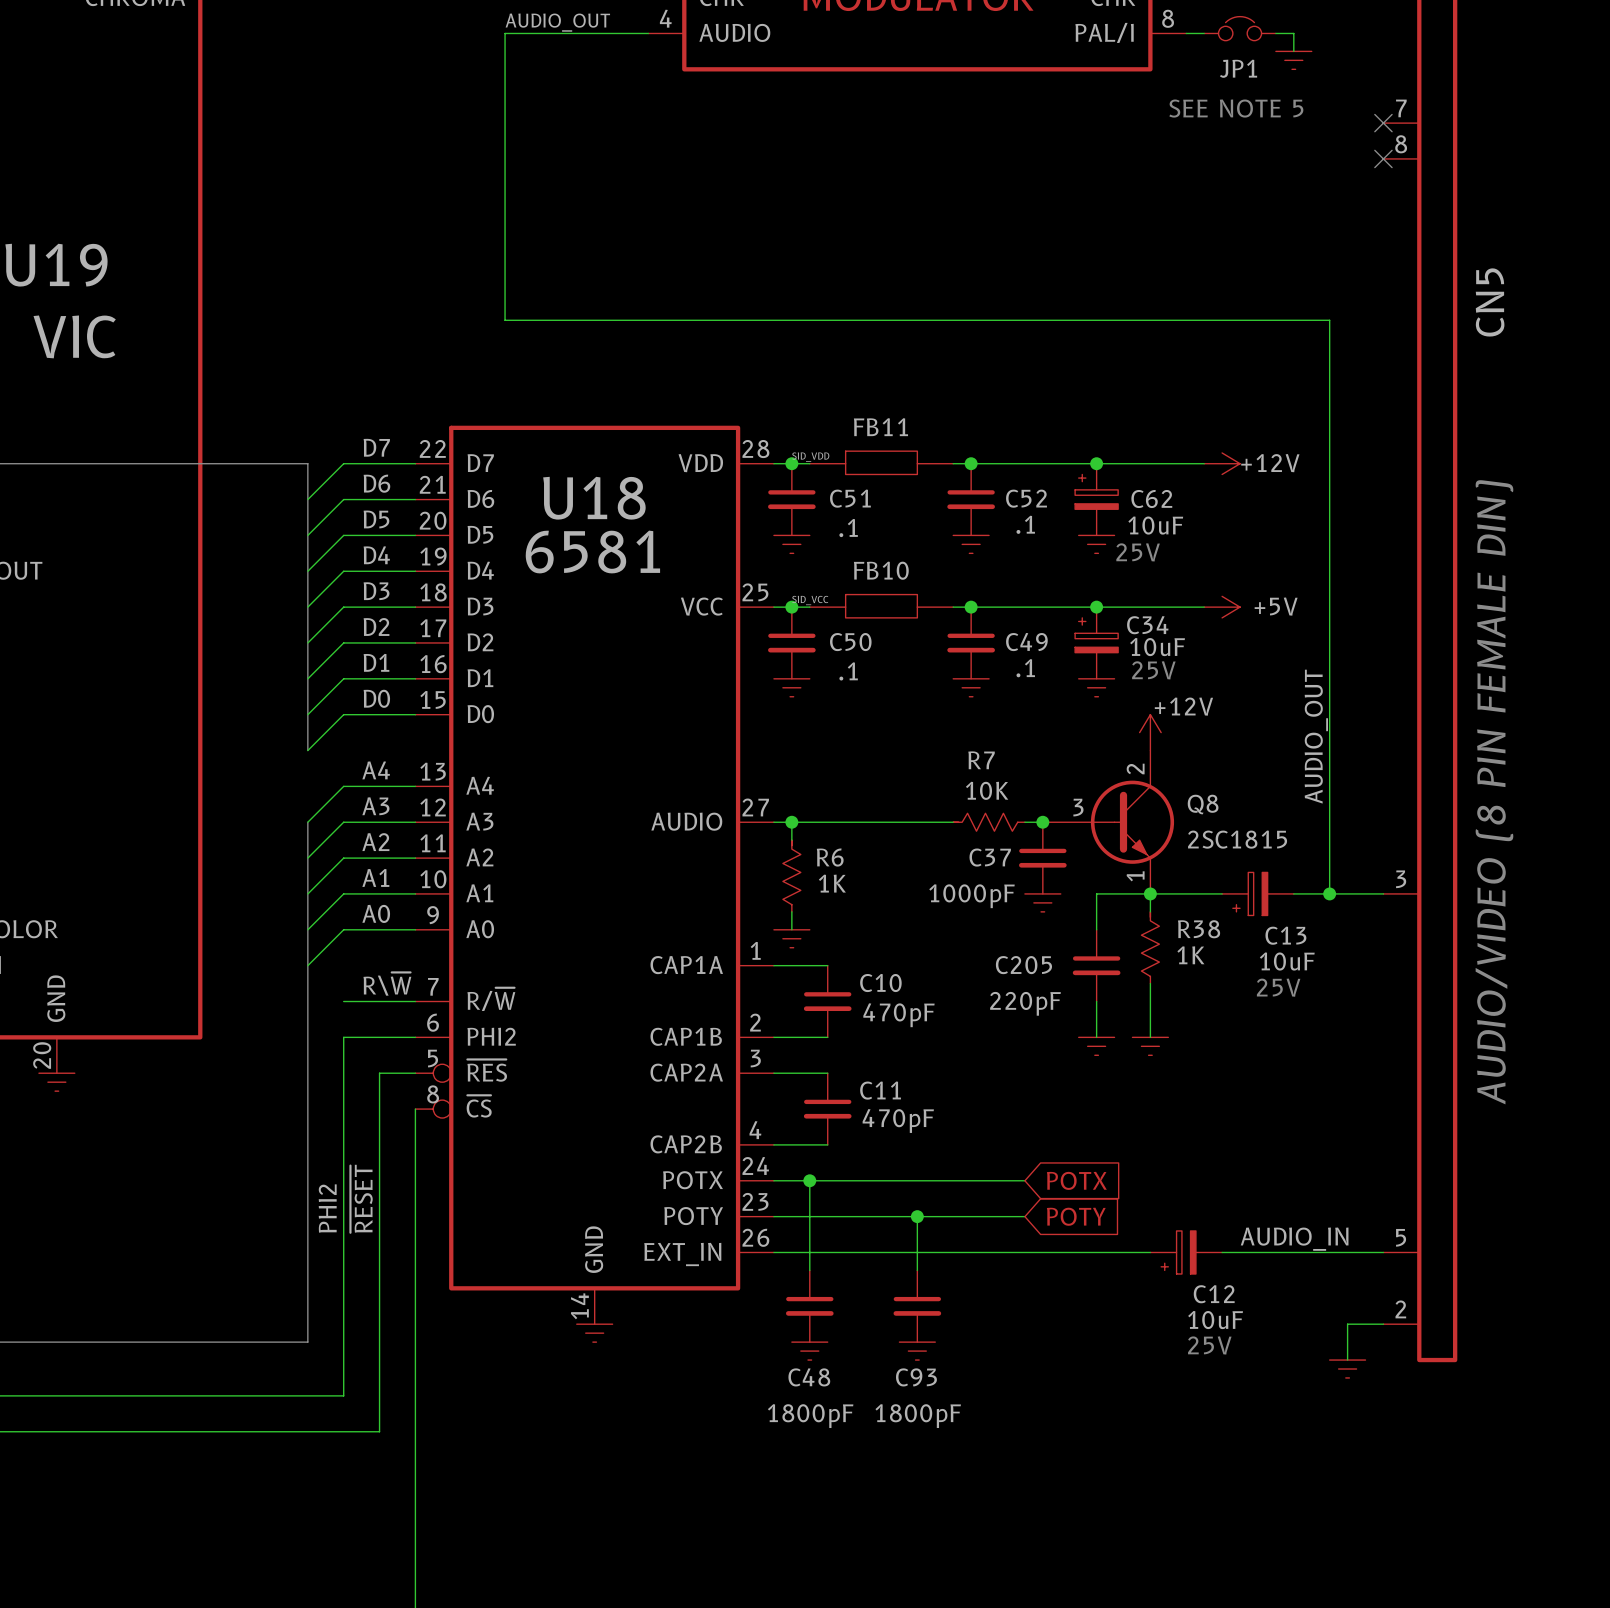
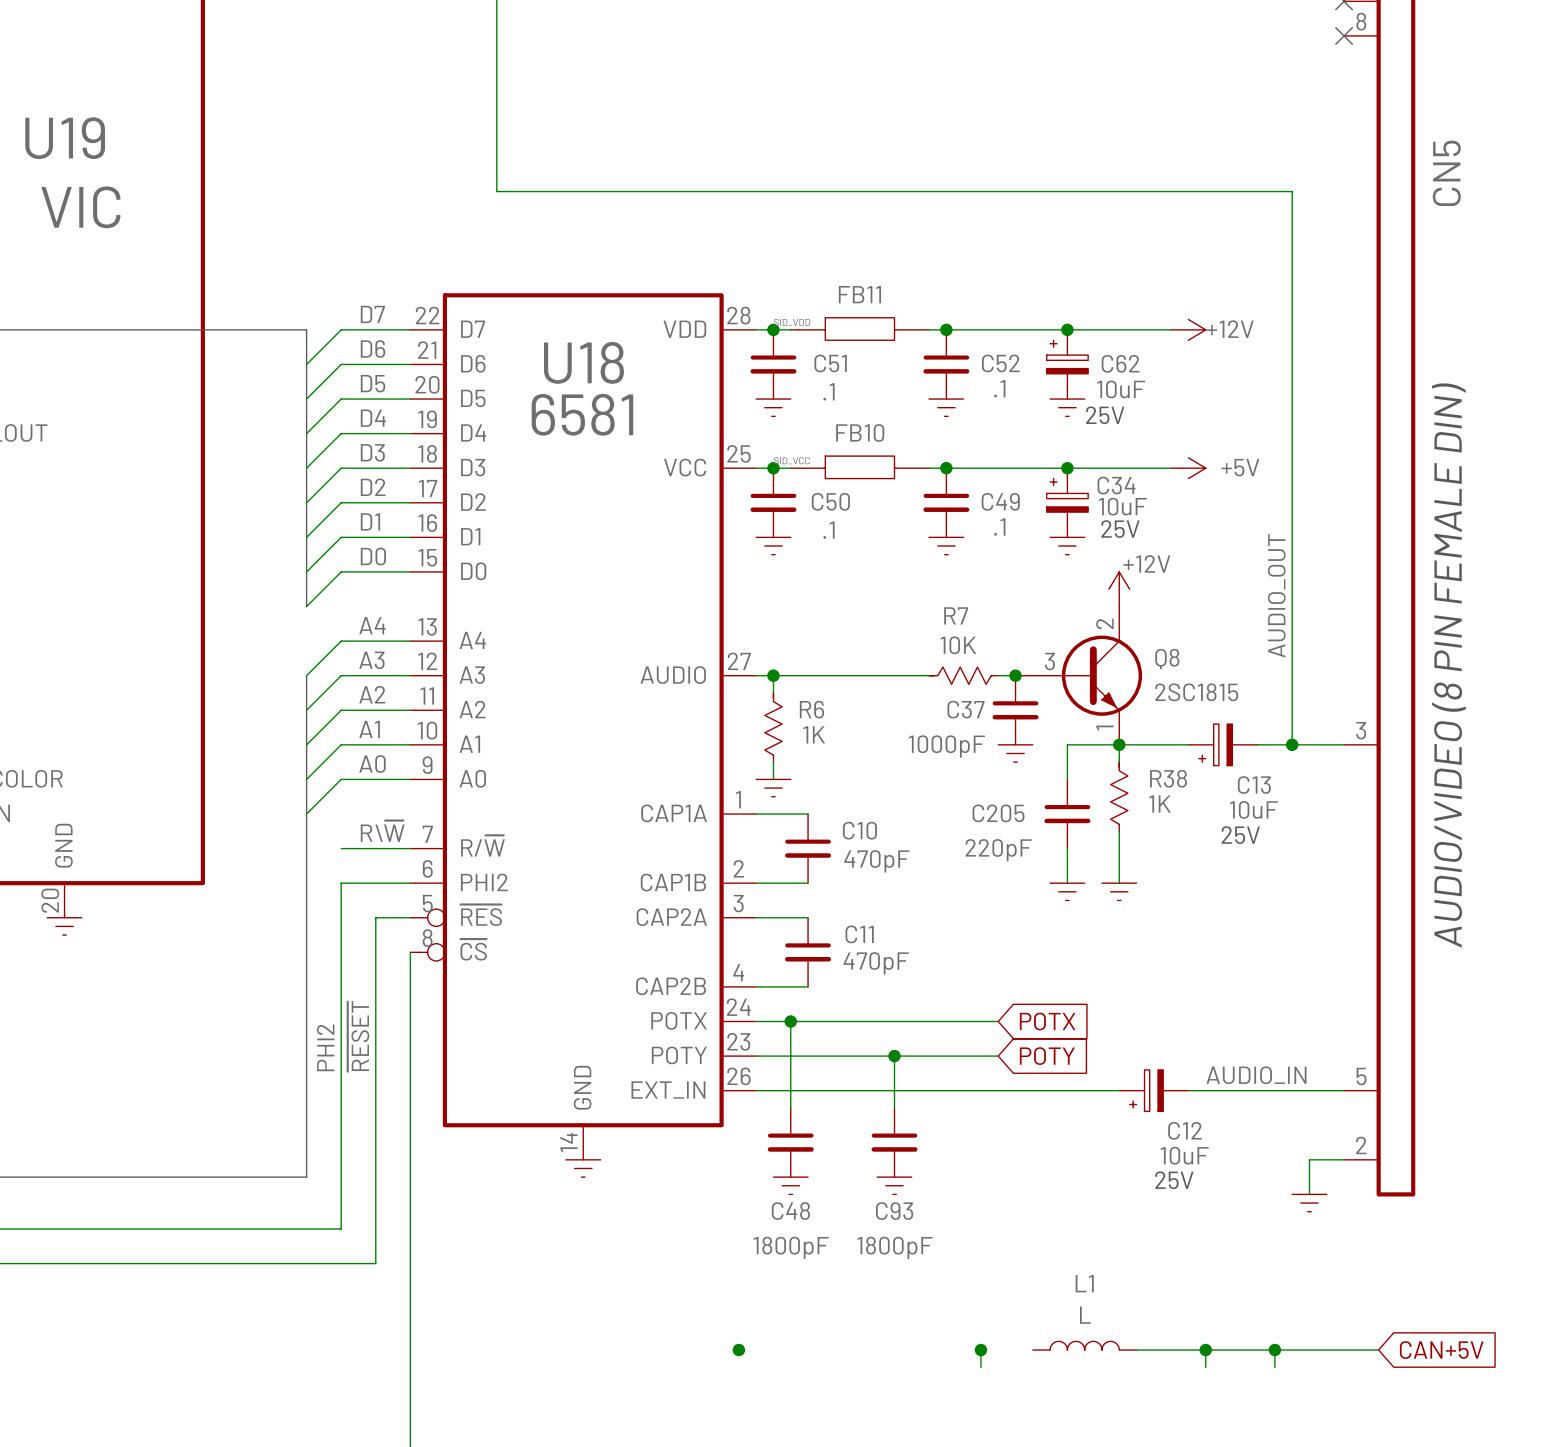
L1: none -> L (1084, 1345)
junction: none -> (738, 1350)
wire: none -> (980, 1350) (980, 1367)
junction: none -> (980, 1350)
wire: none -> (1136, 1350) (1378, 1350)
wire: none -> (1205, 1350) (1205, 1367)
junction: none -> (1205, 1350)
wire: none -> (1274, 1350) (1274, 1367)
junction: none -> (1274, 1350)
global label: none -> CAN+5V (1441, 1350)

